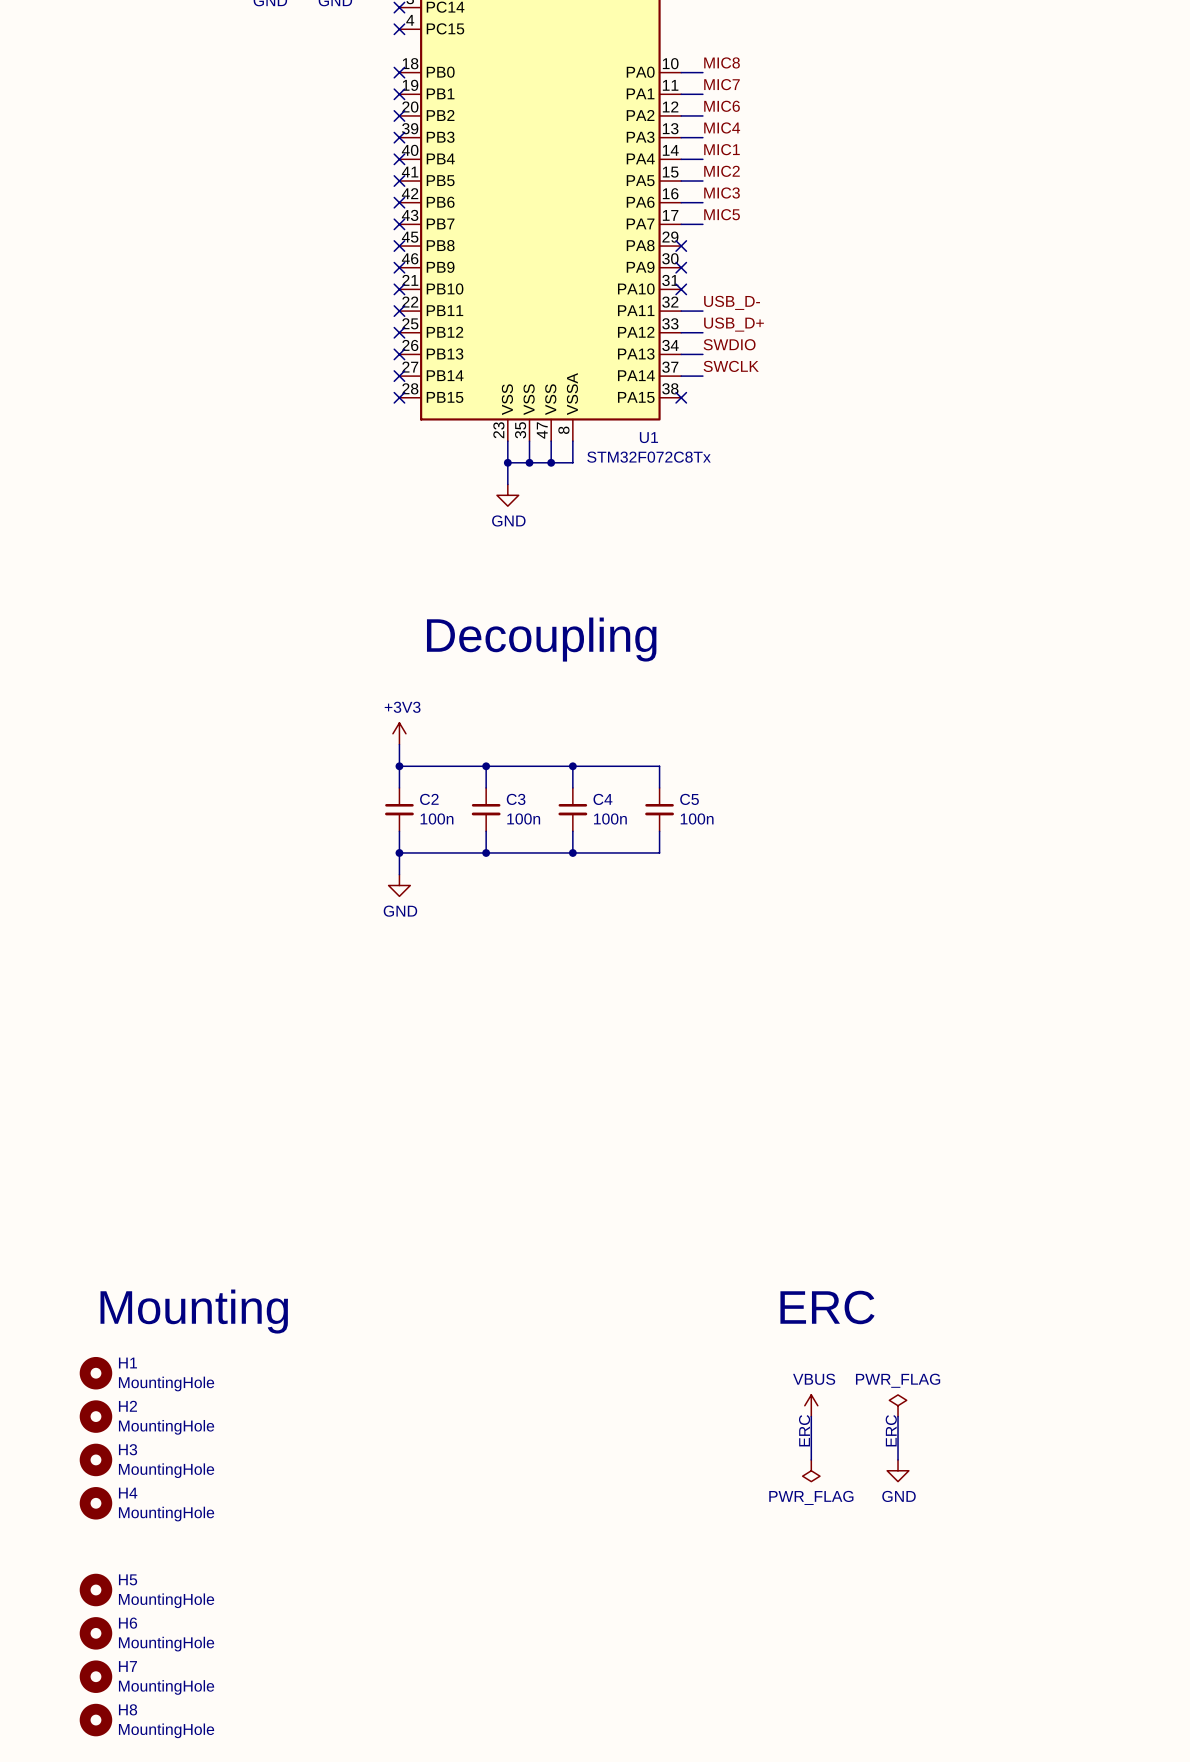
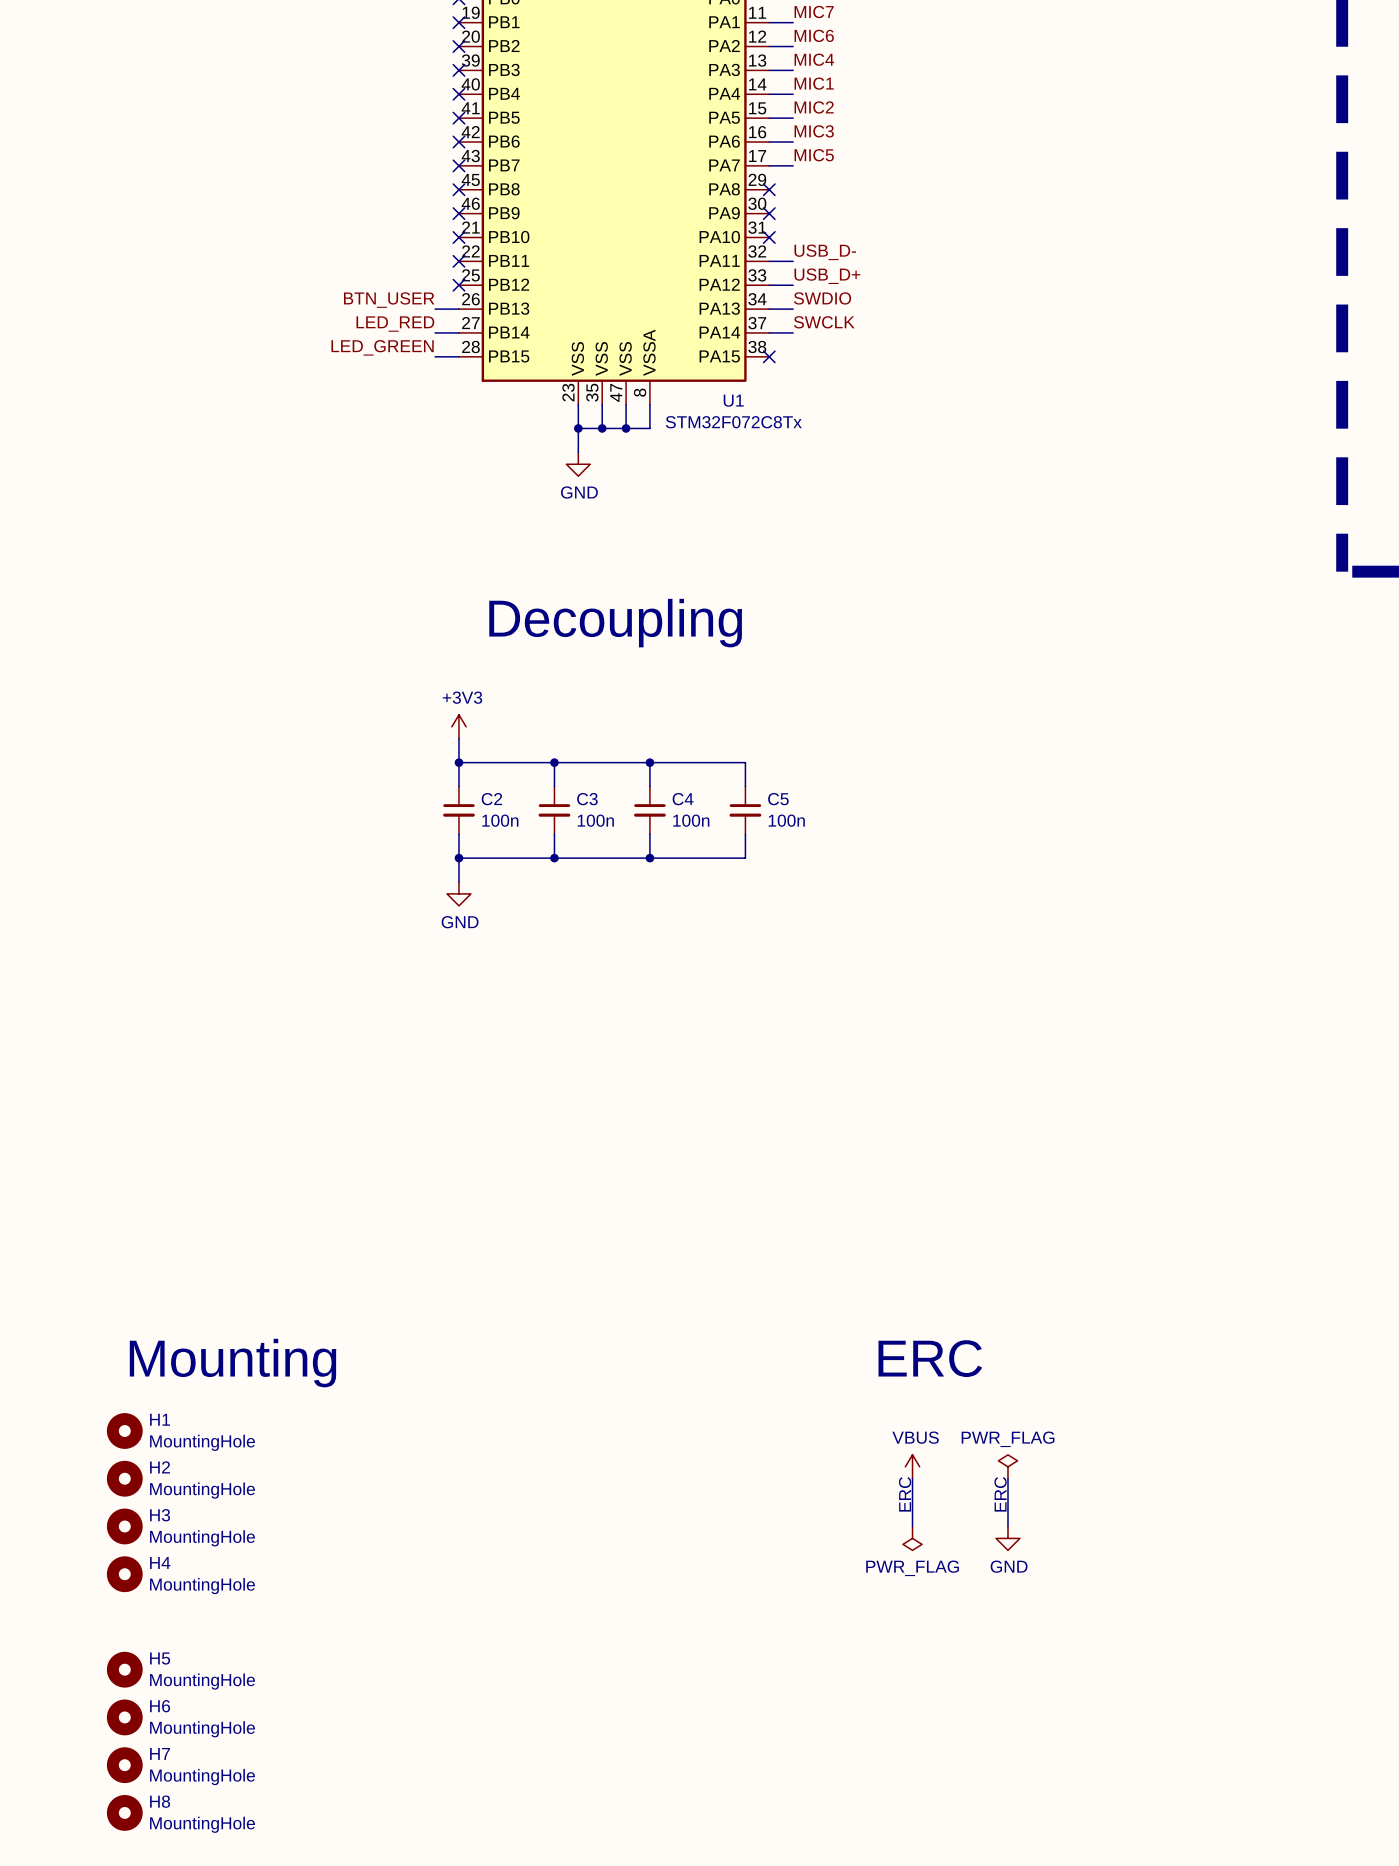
label: none -> BTN_USER (389, 300)
wire: none -> (435, 309) (458, 309)
no-connect mark: (399, 354) -> none
label: none -> LED_RED (395, 324)
wire: none -> (435, 332) (458, 332)
no-connect mark: (399, 376) -> none
label: none -> LED_GREEN (382, 347)
wire: none -> (435, 356) (458, 356)
no-connect mark: (399, 397) -> none

